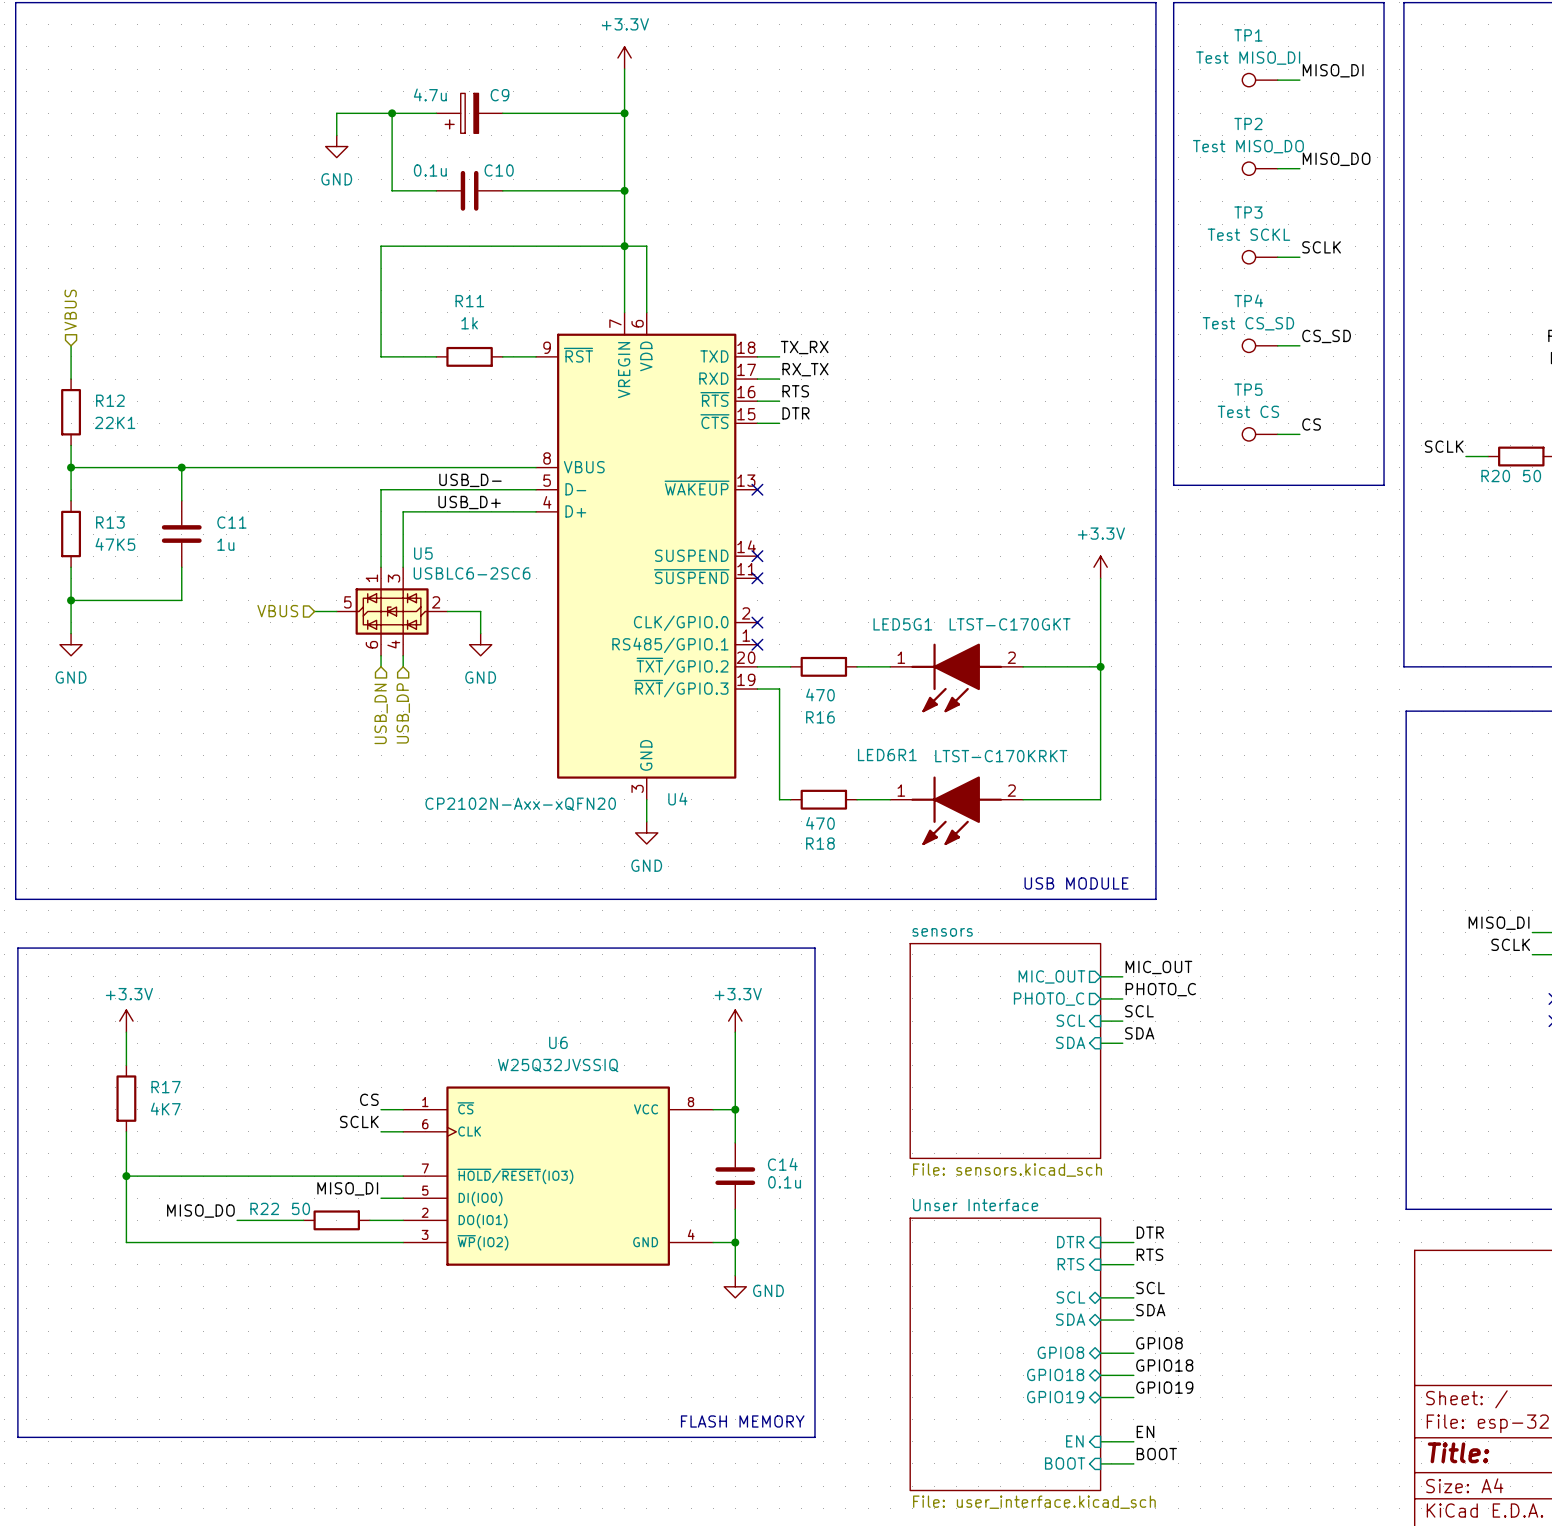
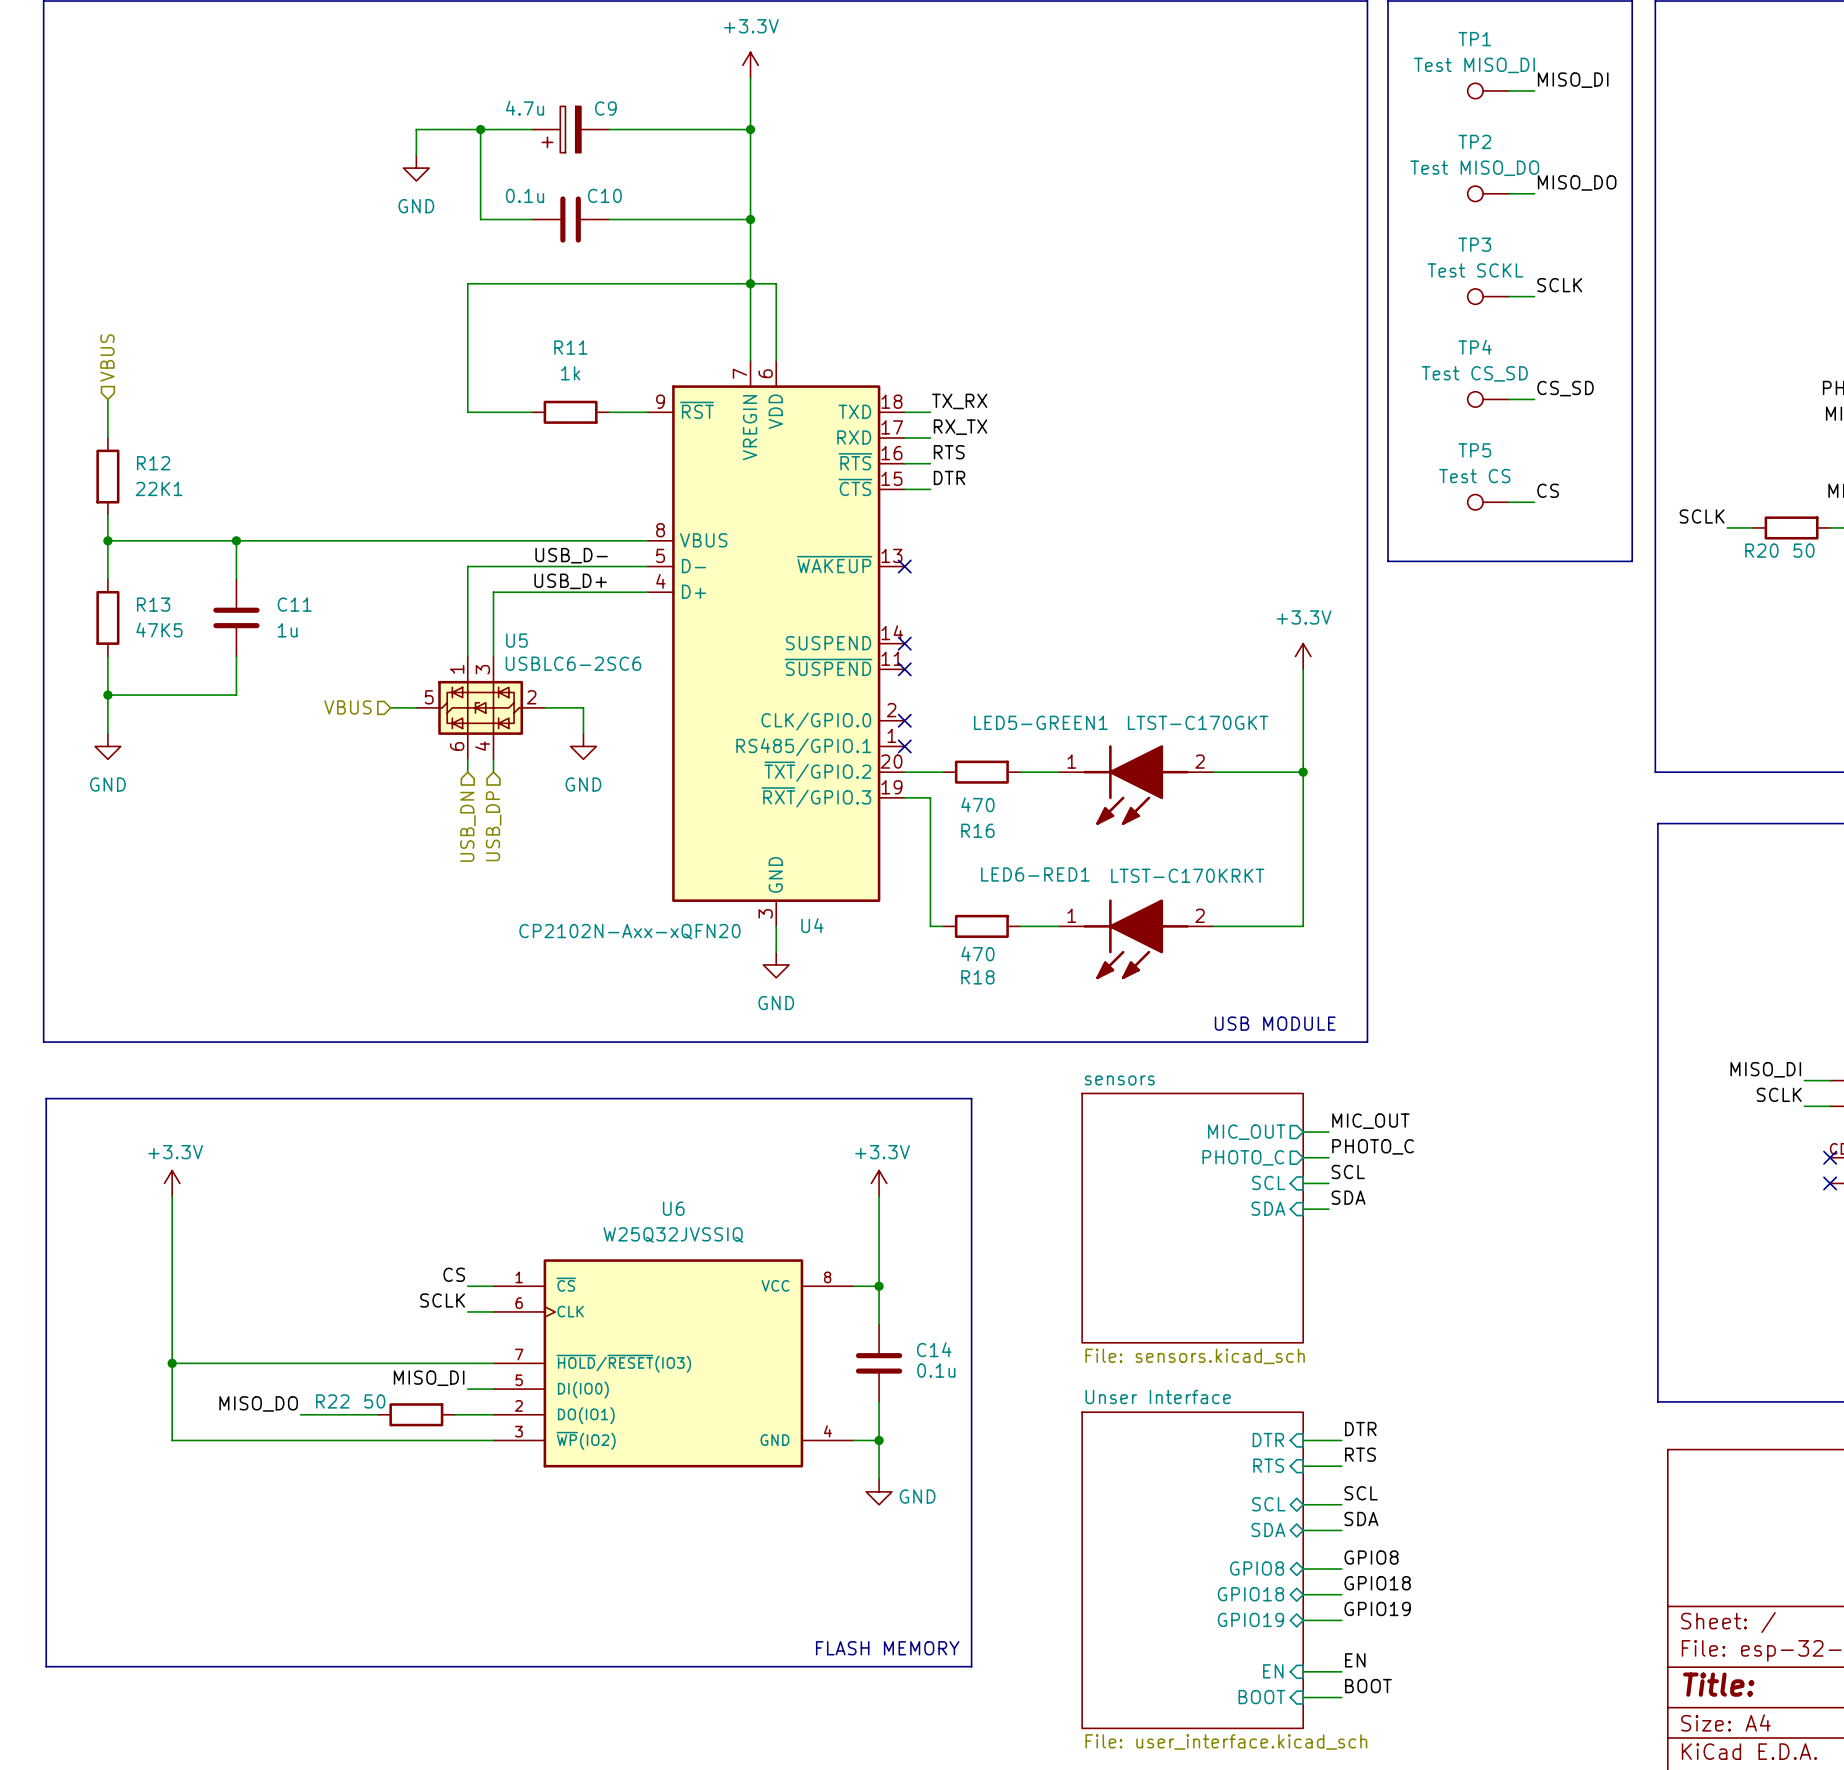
LED5G1 name: LED5G1 (902, 624) -> LED5-GREEN1 (1040, 722)
LED6R1 name: LED6R1 (887, 755) -> LED6-RED1 (1035, 874)
wire: none -> (172, 1234) (172, 1311)
R17: 4K7 (126, 1098) -> none

